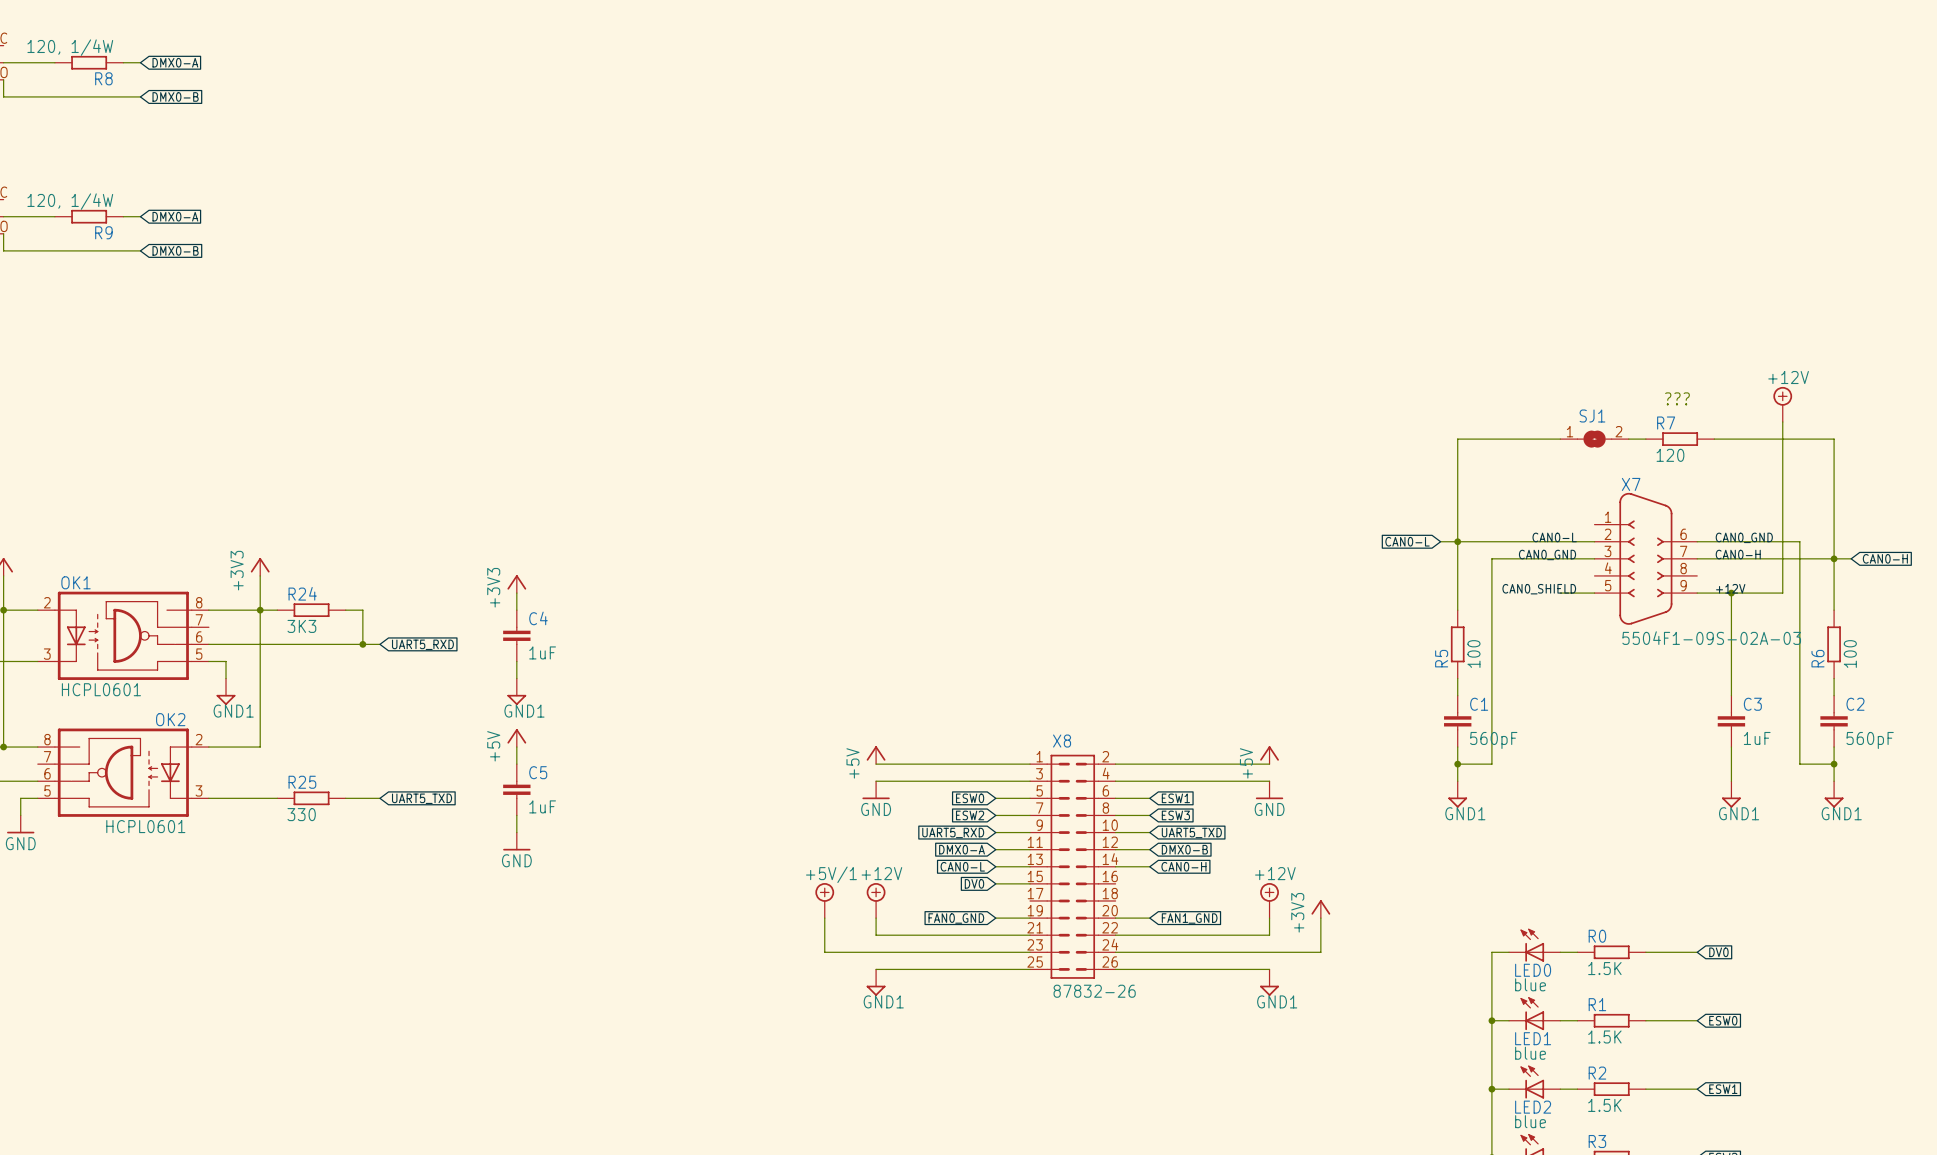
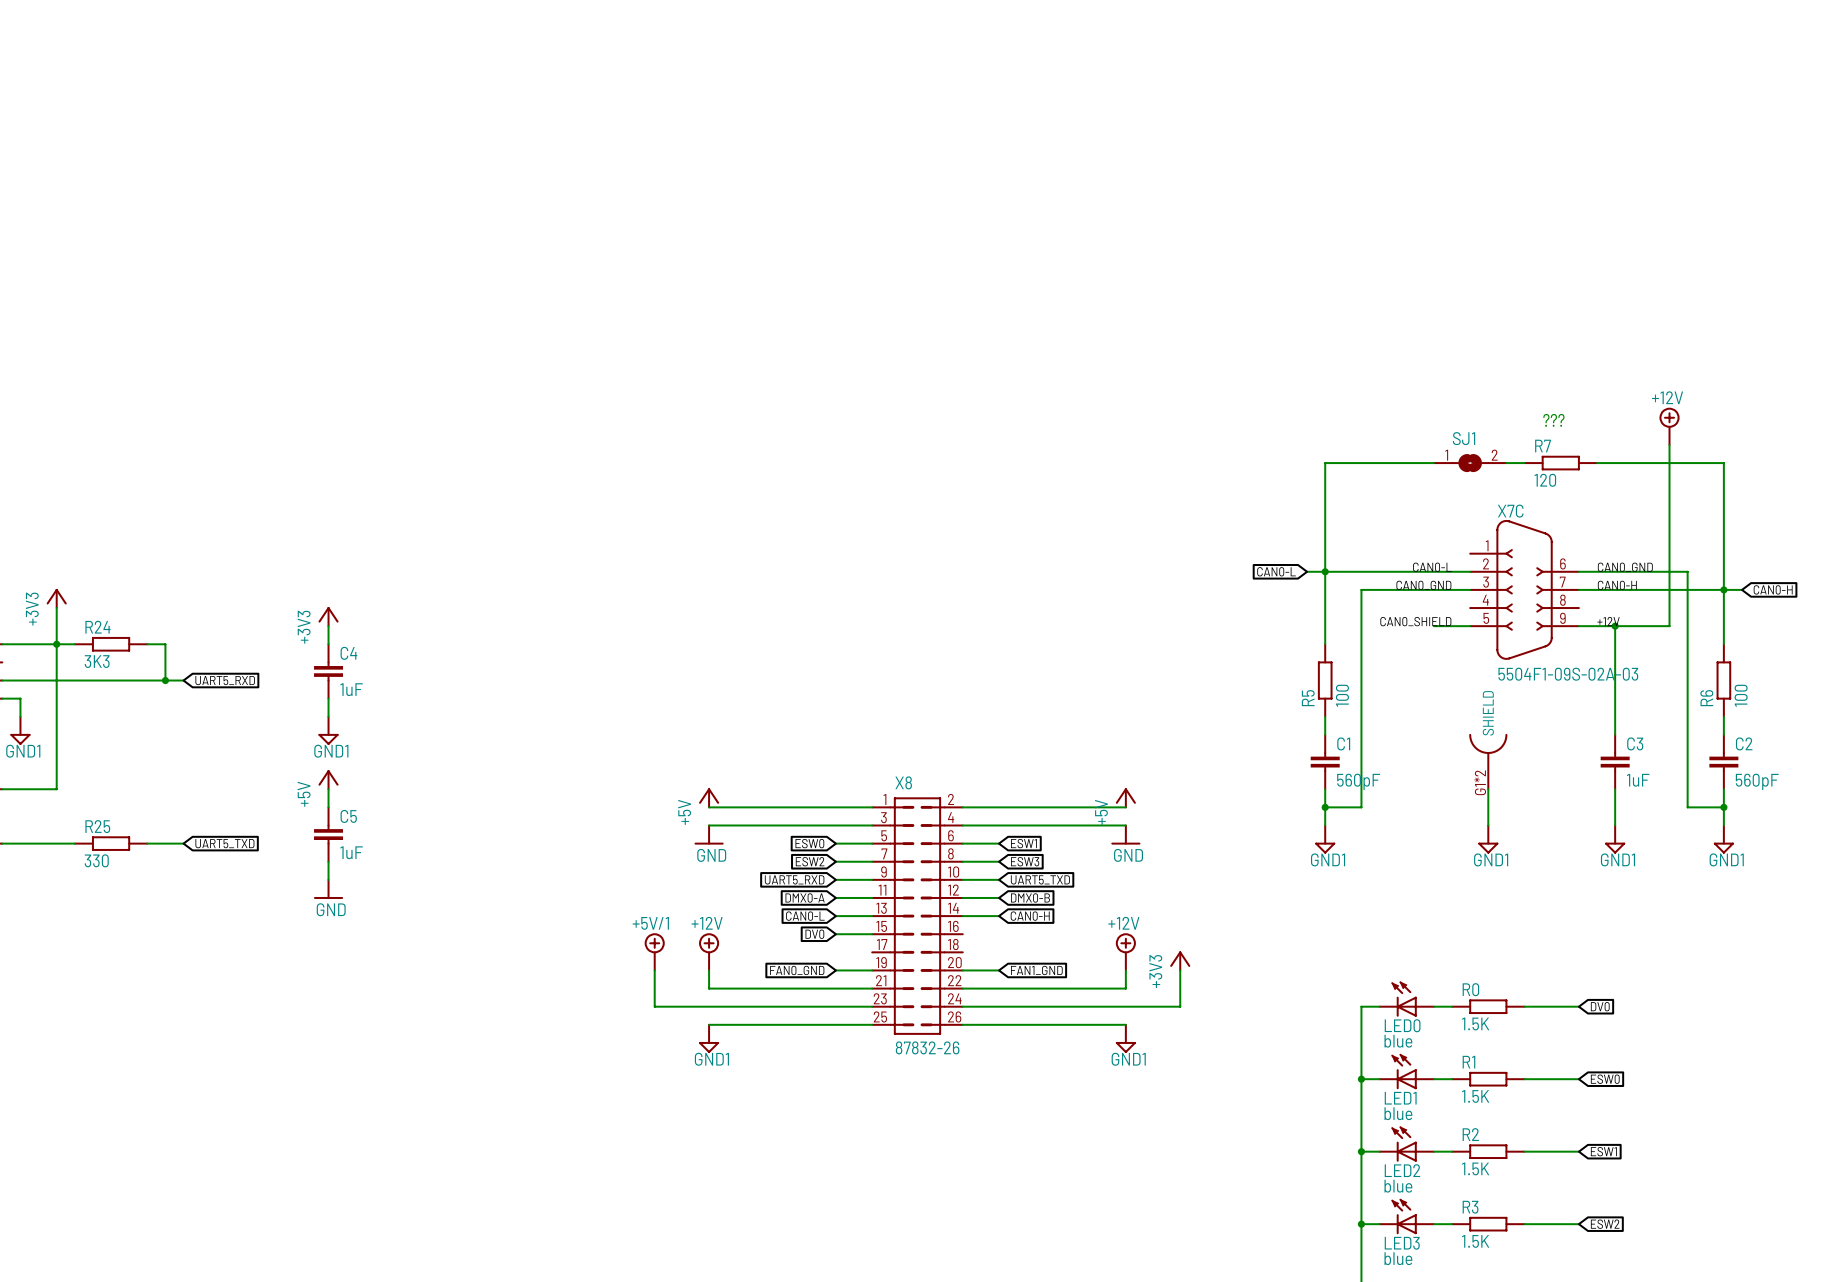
X7 name: X7 (1631, 484) -> X7C (1510, 511)
part: none -> (1488, 761)
wire: none -> (1488, 789) (1488, 825)
power symbol: none -> GND1 (1488, 839)

